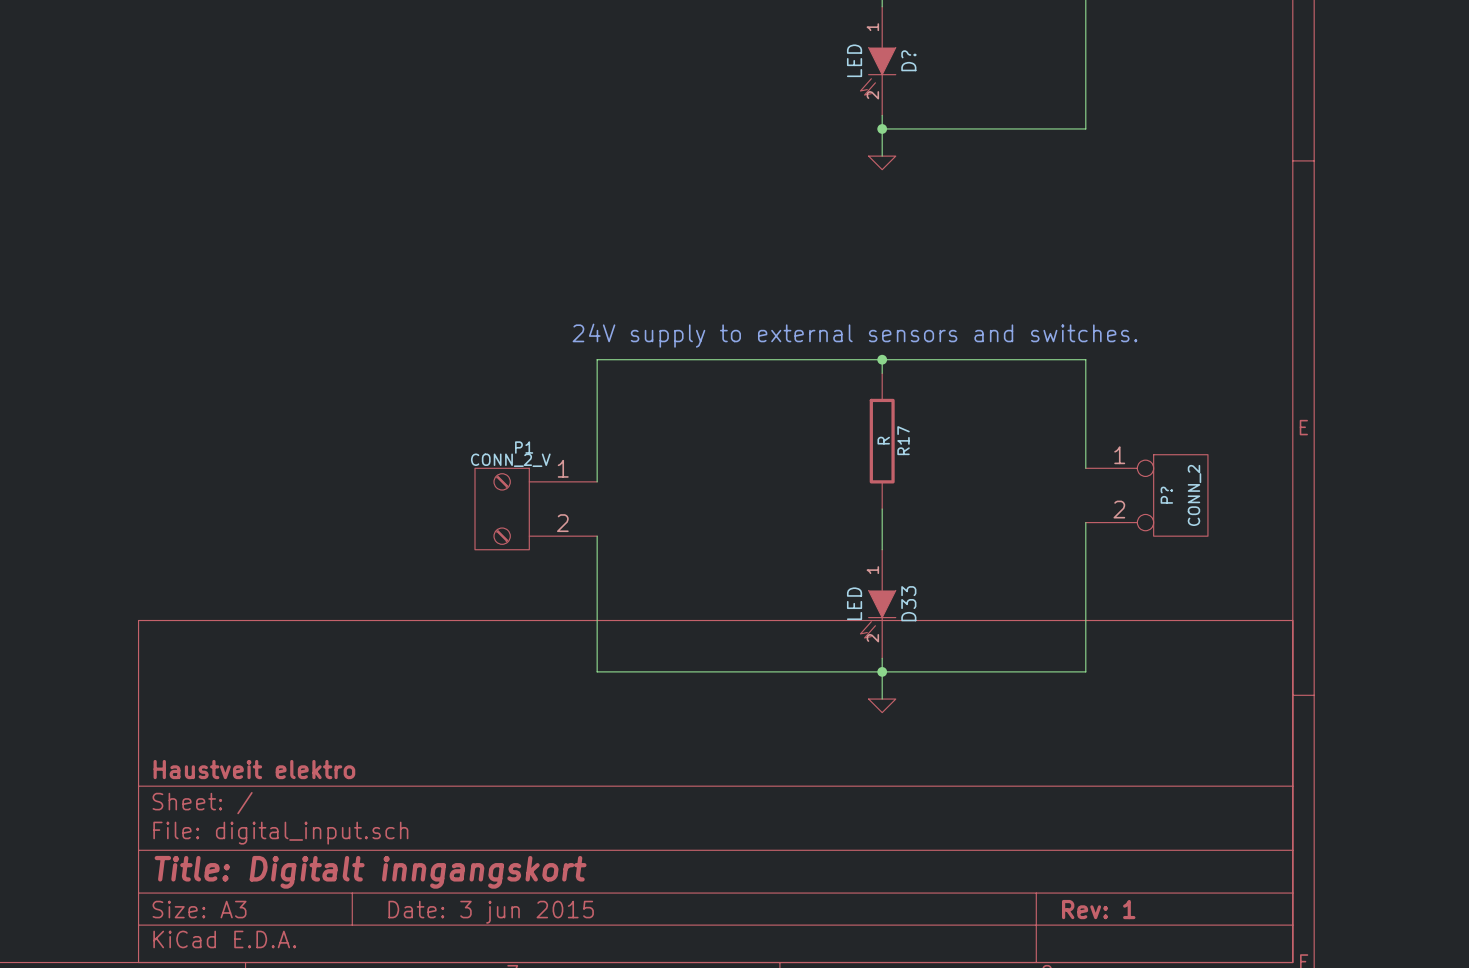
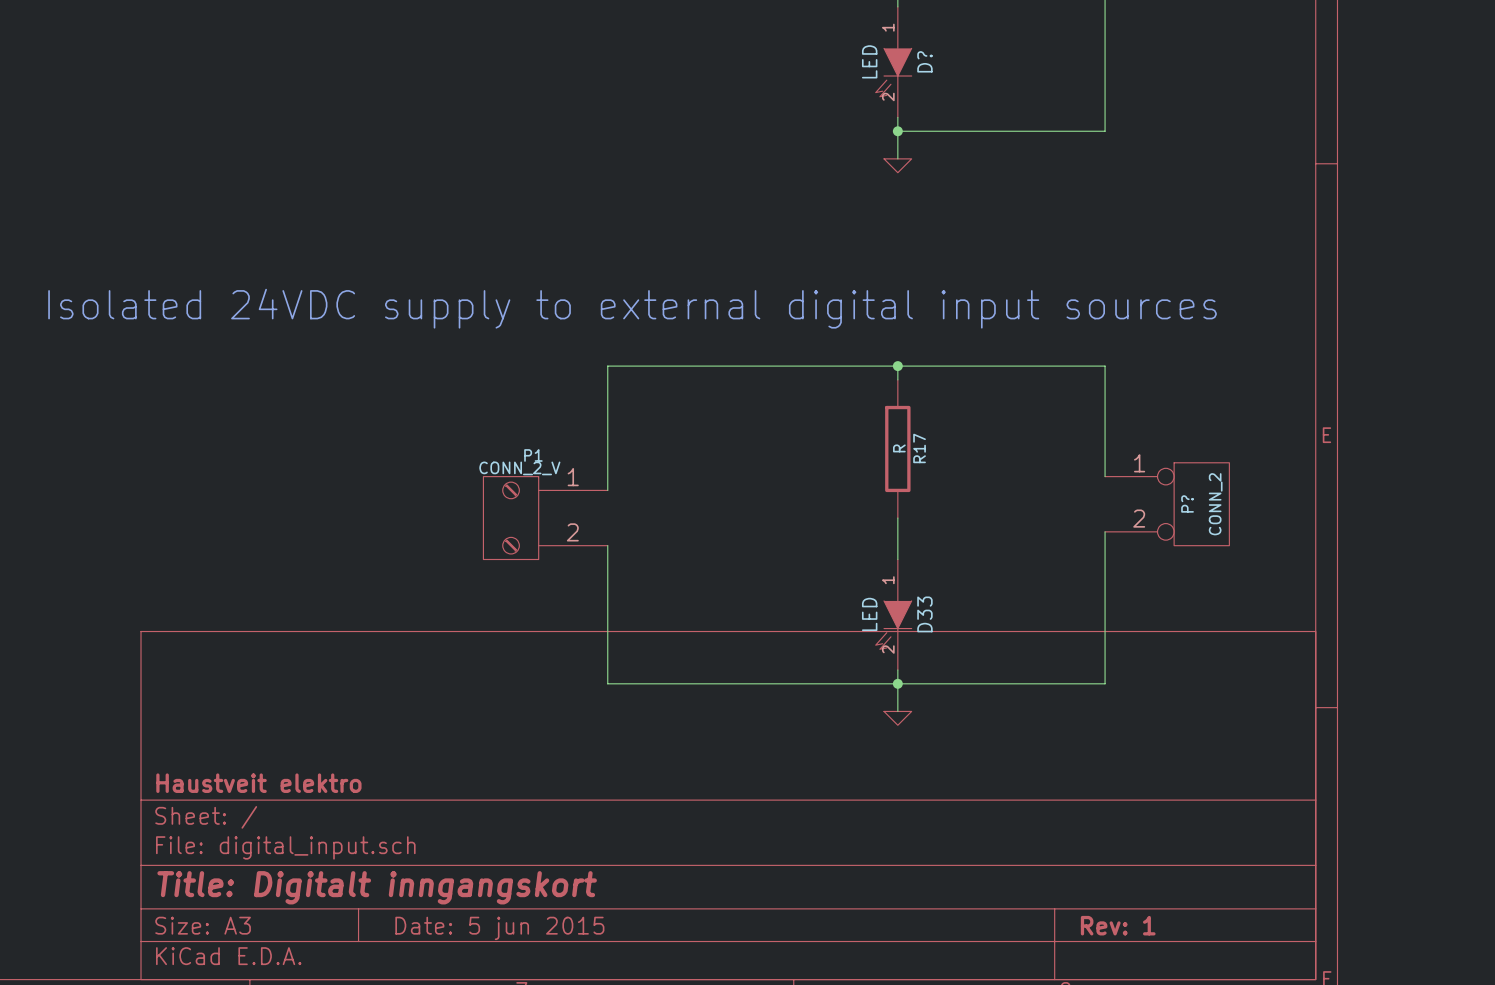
text: none -> Isolated 24VDC supply to external digital input sources (632, 308)
text: 24V supply to external sensors and switches. (854, 335) -> none
title block: Date: 3 jun 2015 (491, 912) -> Date: 5 jun 2015 (499, 928)

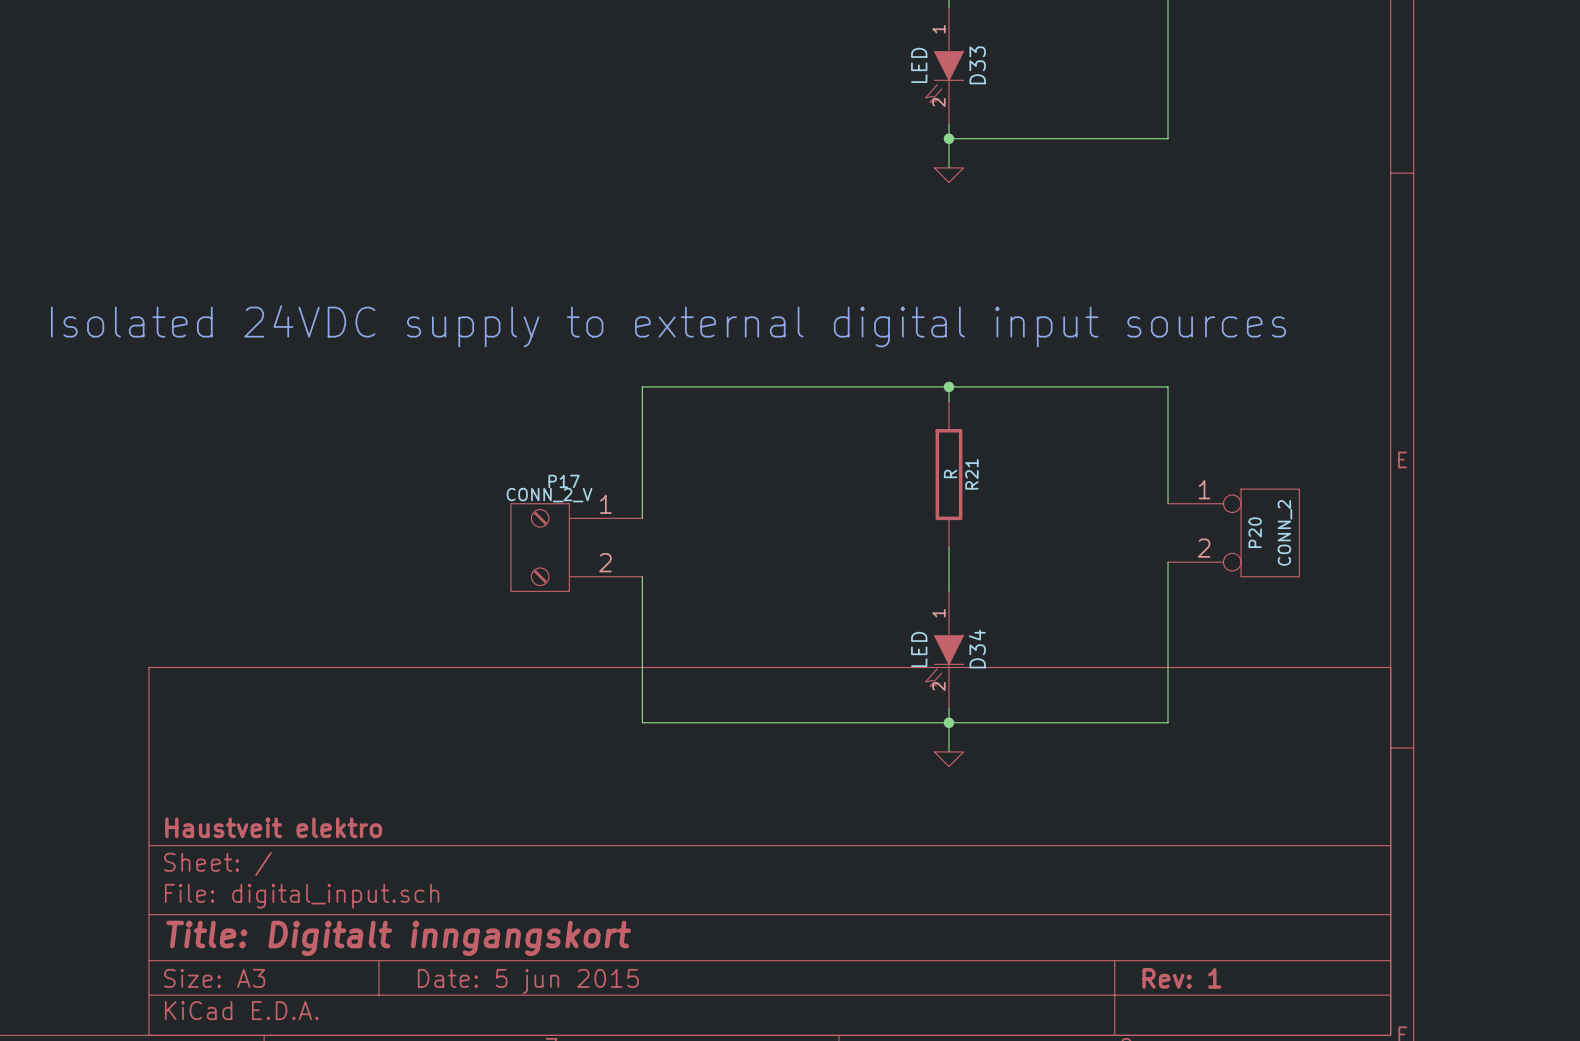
D? name: D? (924, 61) -> D33 (977, 65)
R17 name: R17 (919, 448) -> R21 (971, 474)
P1 name: P1 (533, 455) -> P17 (564, 481)
P? name: P? (1187, 503) -> P20 (1255, 532)
D33 name: D33 (924, 614) -> D34 (977, 649)

